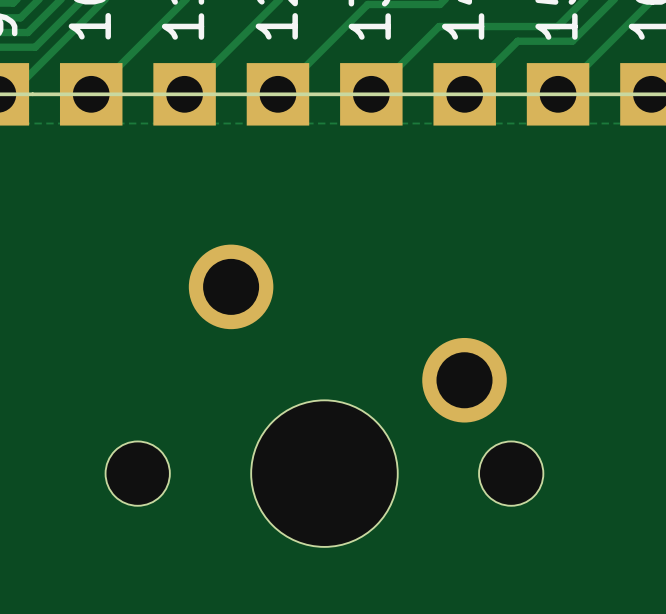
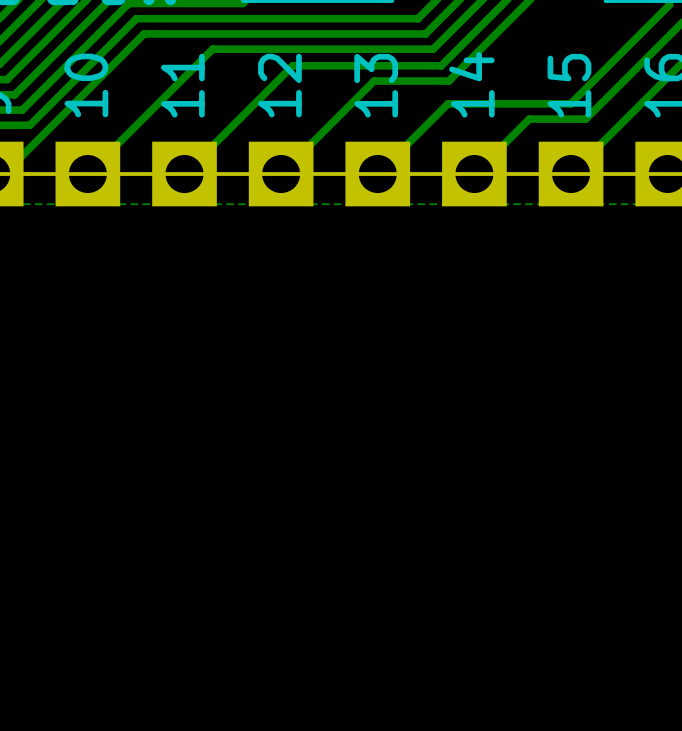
part: (324, 395) -> none

